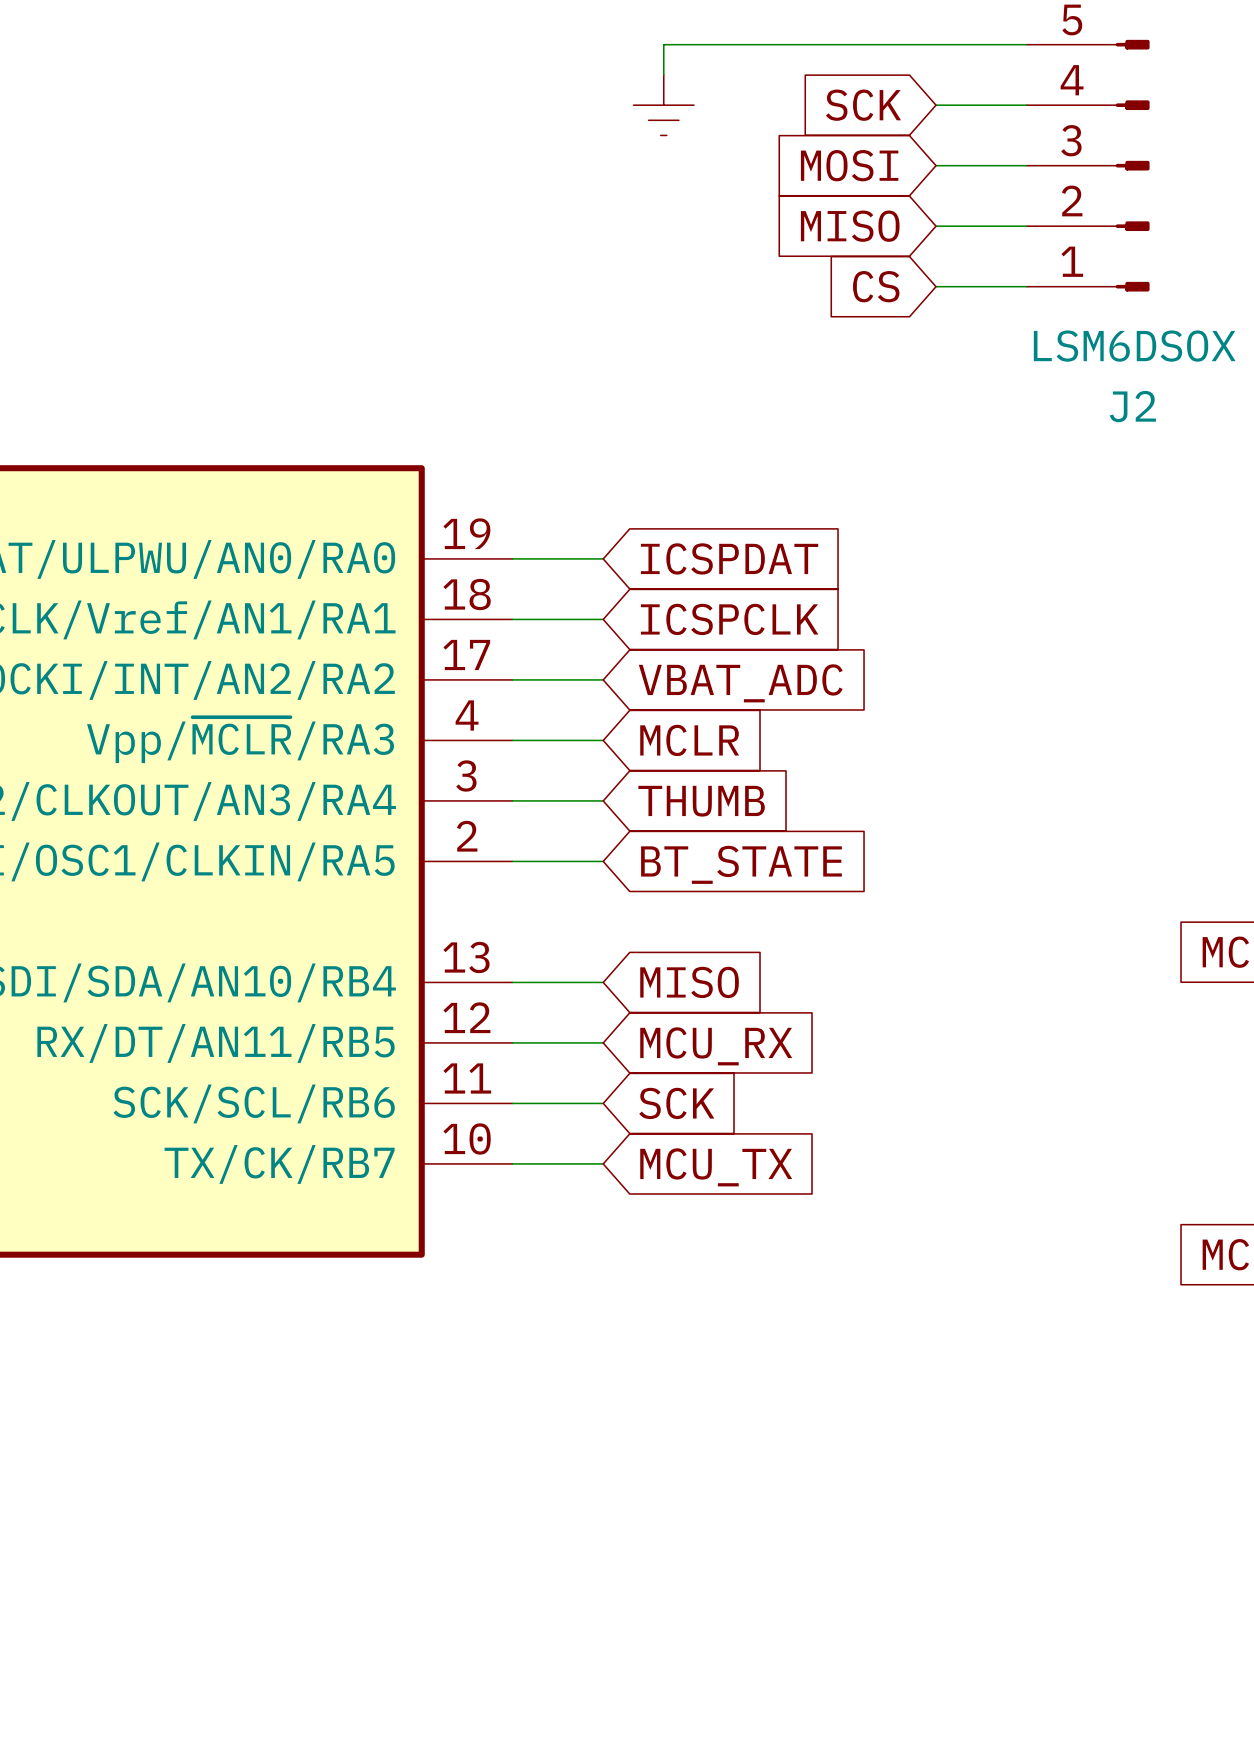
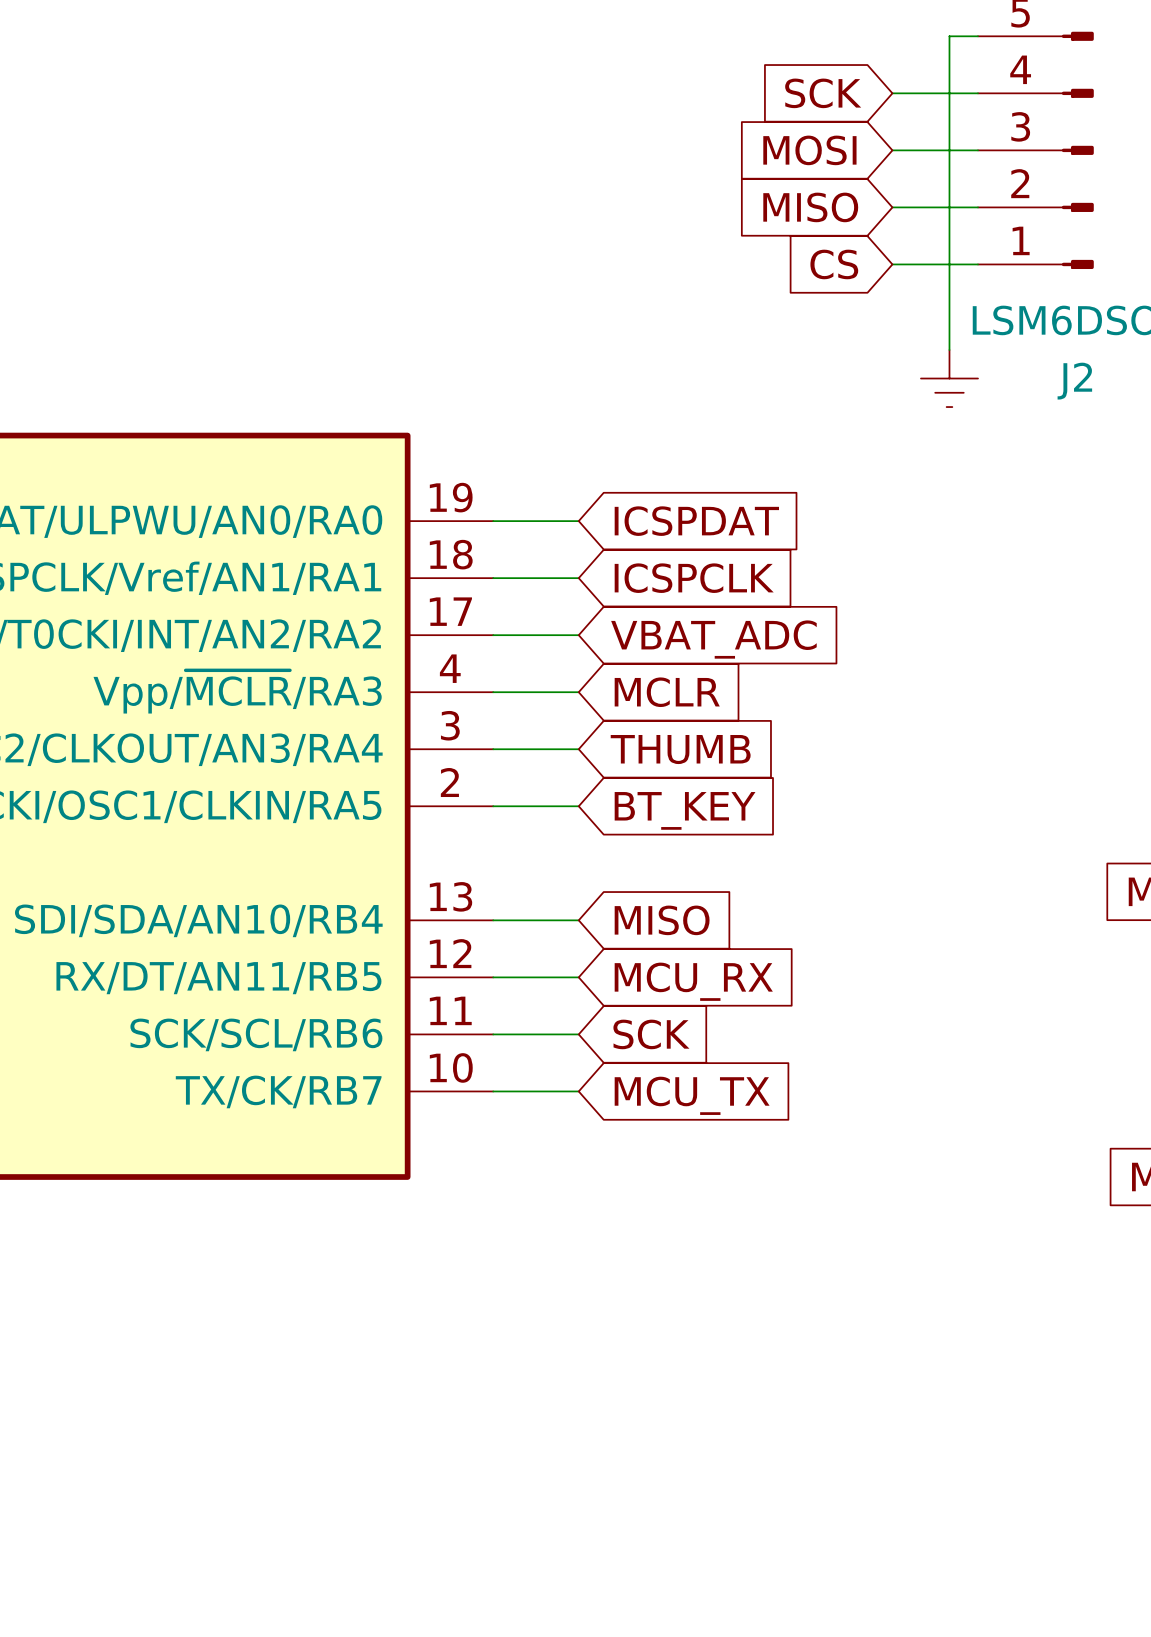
wire: (996, 44) (663, 44) (663, 74) -> (949, 36) (949, 350)
power symbol position: (663, 105) -> (949, 378)
global label: BT_STATE (741, 864) -> BT_KEY (685, 810)

